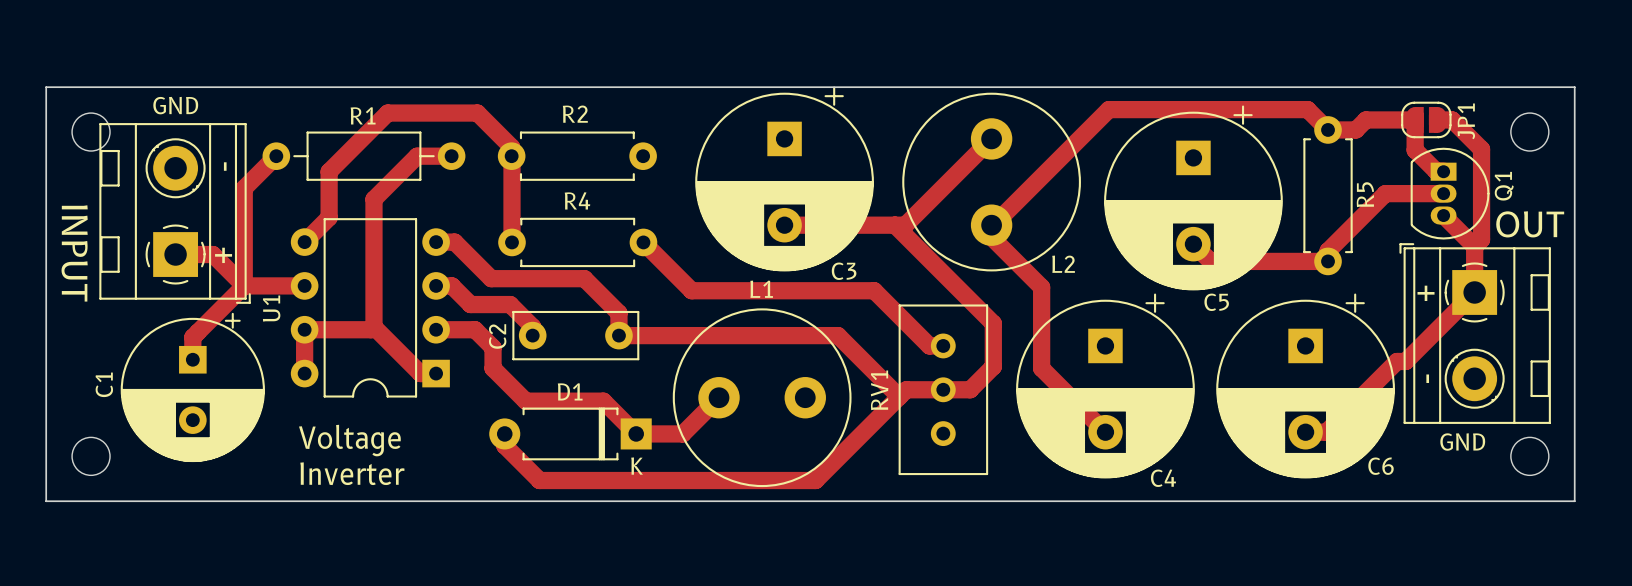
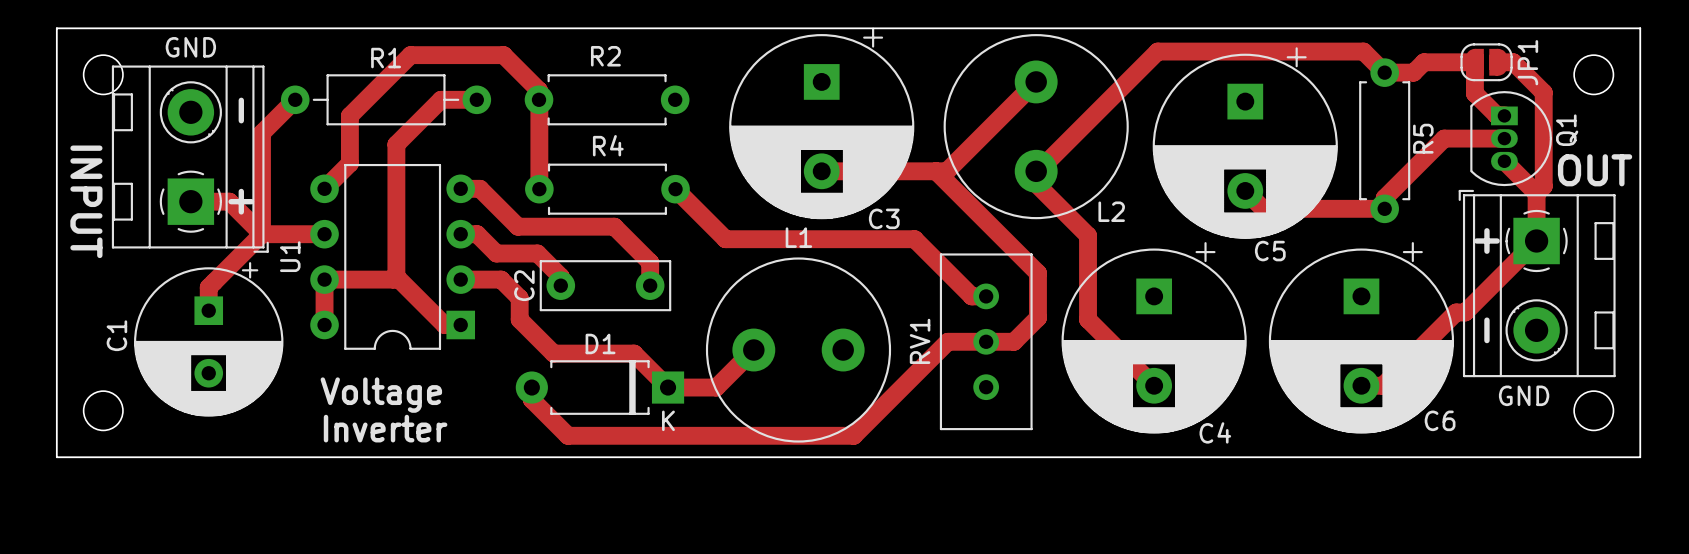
track: (618, 335) (838, 335) (899, 396) -> none

